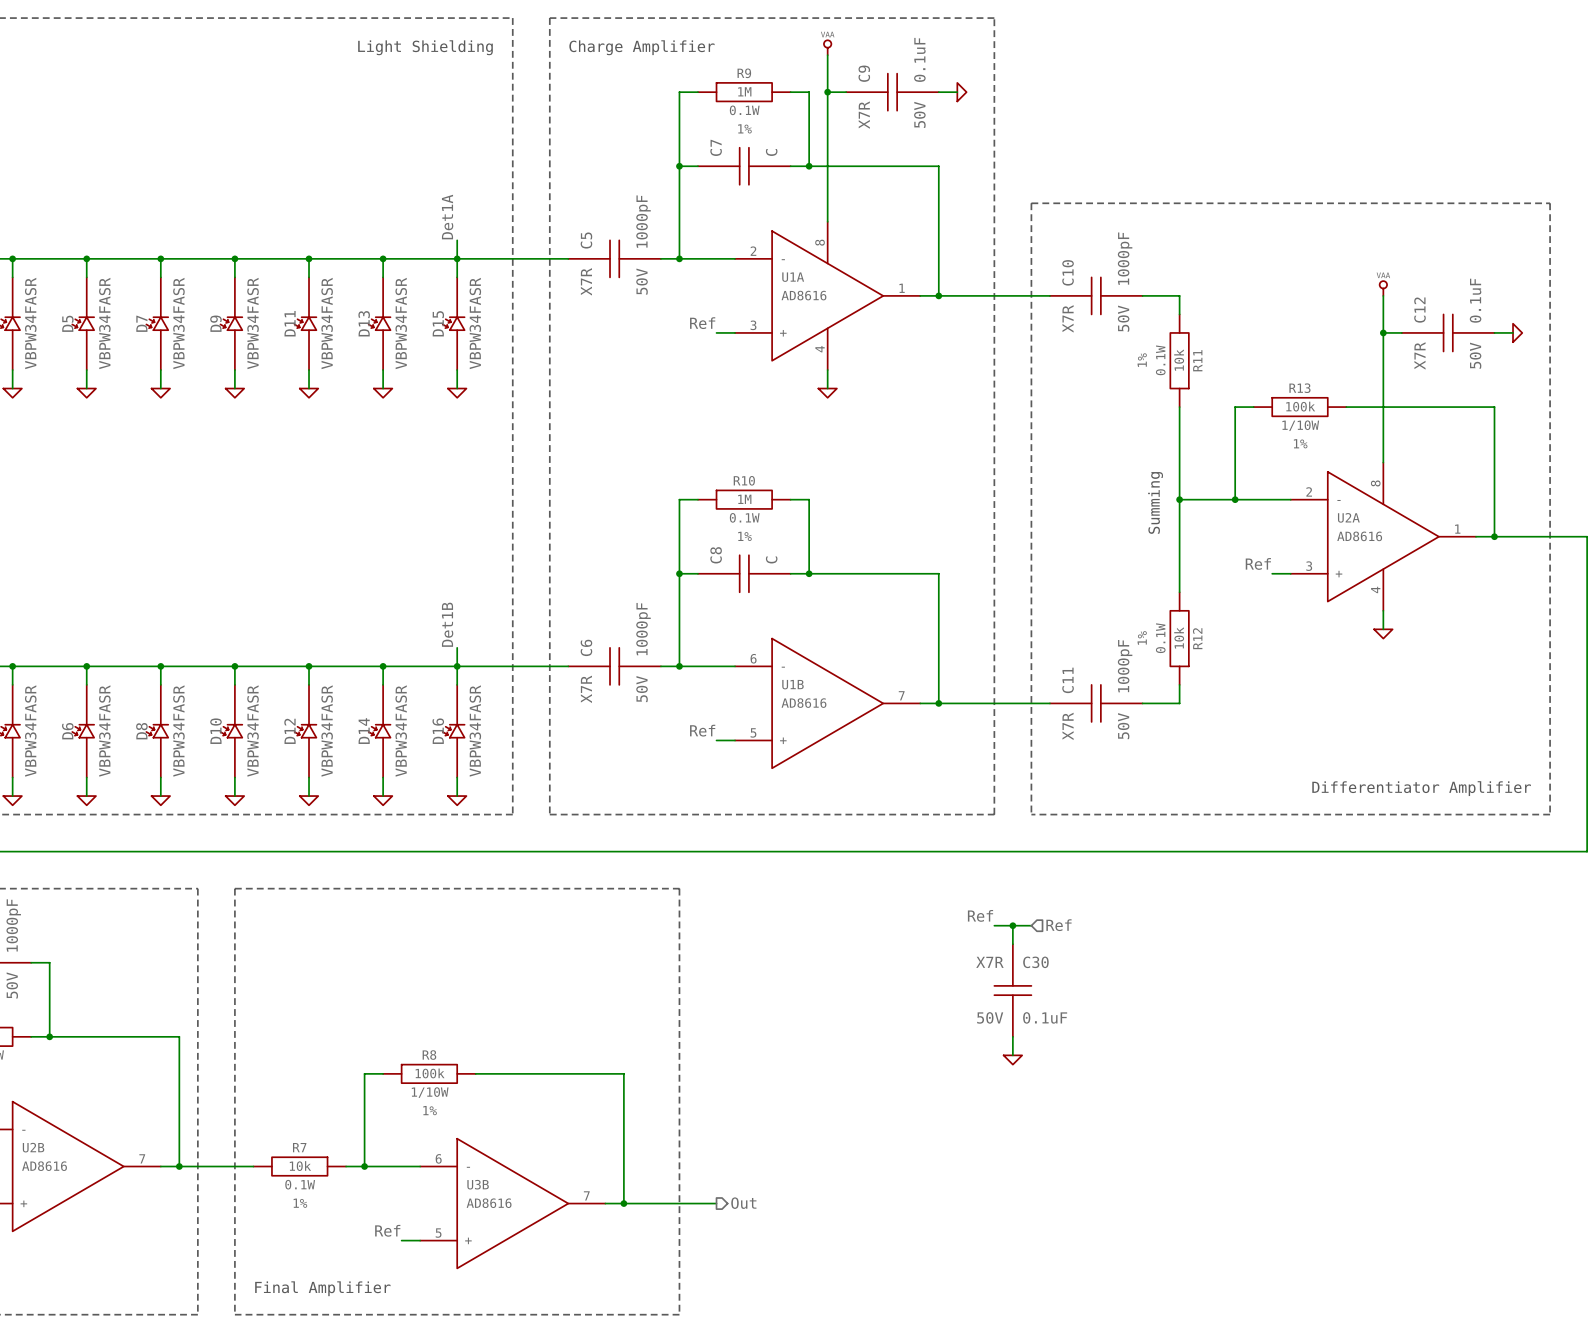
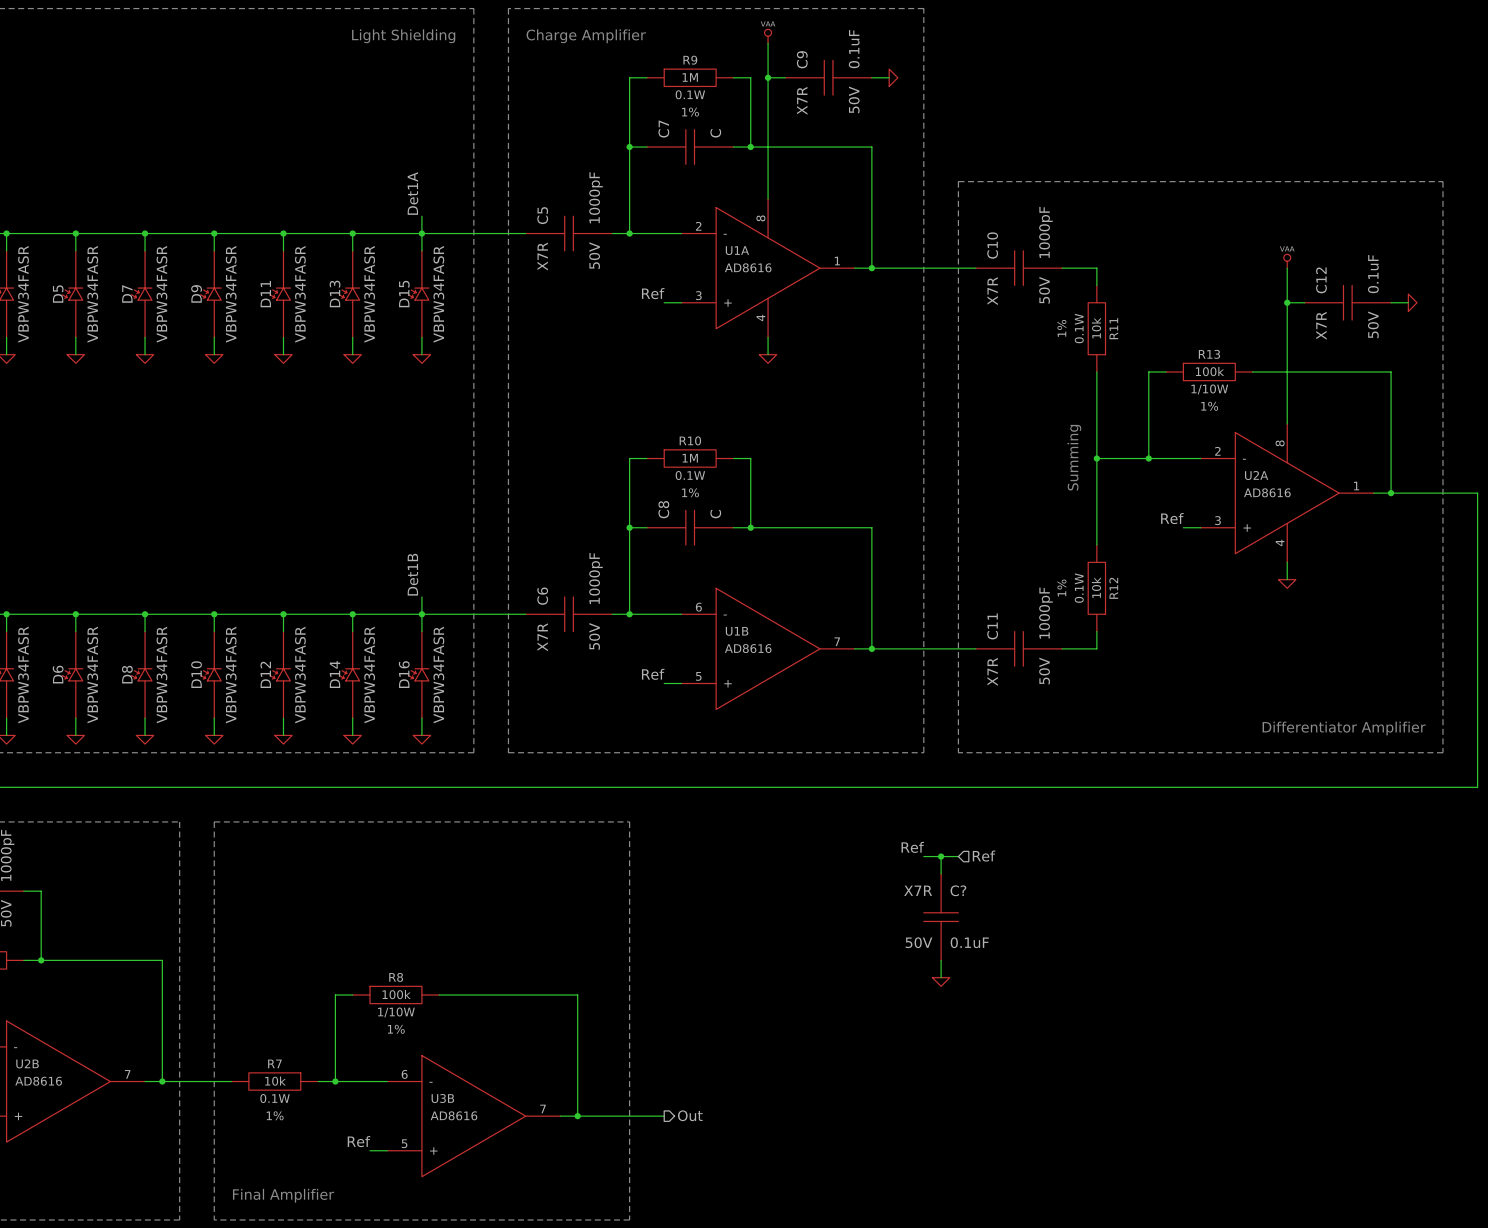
C30 name: C30 (1035, 962) -> C? (958, 890)

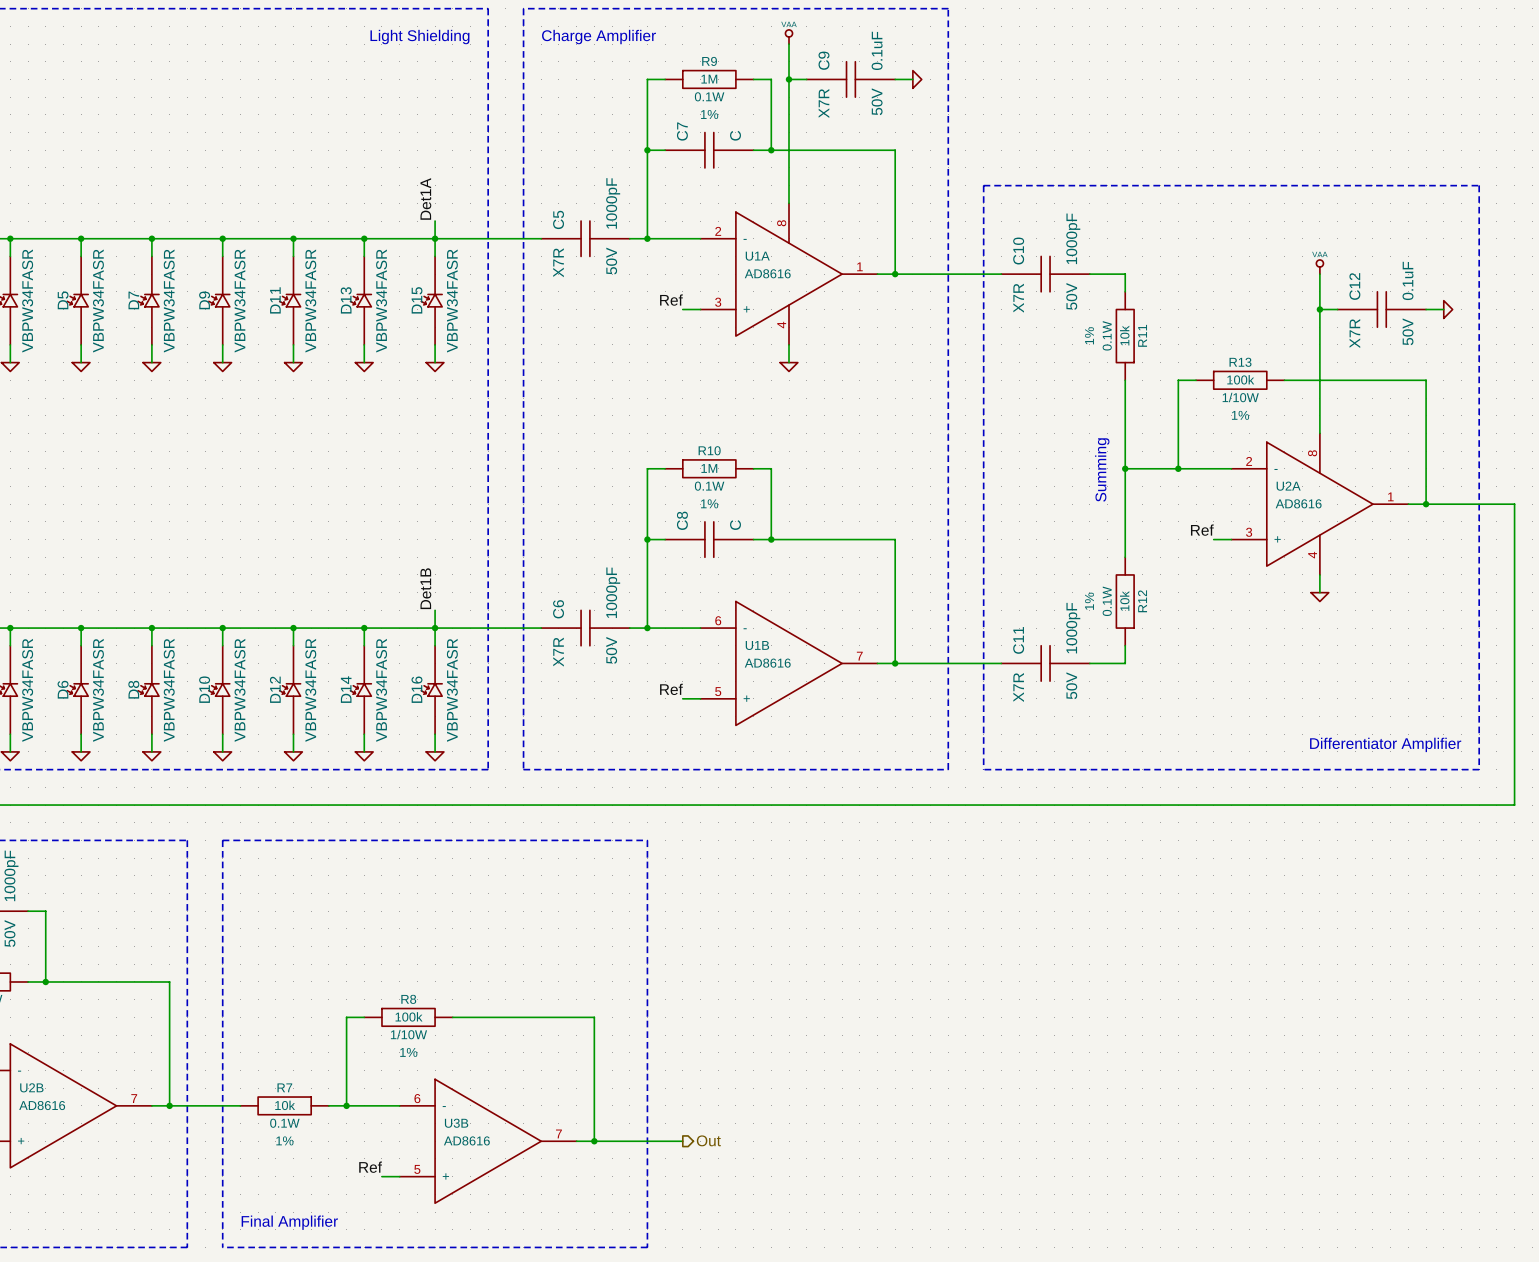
label: Ref (912, 847) -> none
wire: (923, 856) (958, 856) -> none
wire: (941, 856) (941, 873) -> none
junction: (941, 856) -> none
hierarchical label: Ref (984, 856) -> none
C?: 0.1uF (941, 917) -> none
wire: (941, 960) (941, 977) -> none
power symbol: (941, 982) -> none

